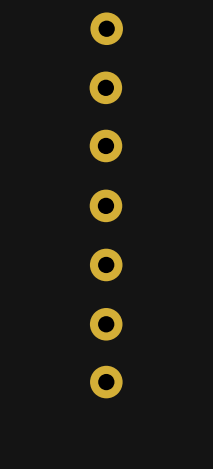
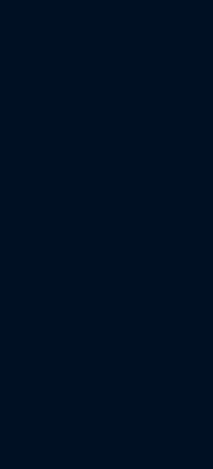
part: (106, 28) -> none
part: (105, 87) -> none
part: (105, 145) -> none
part: (105, 205) -> none
part: (106, 264) -> none
part: (106, 324) -> none
part: (106, 382) -> none

